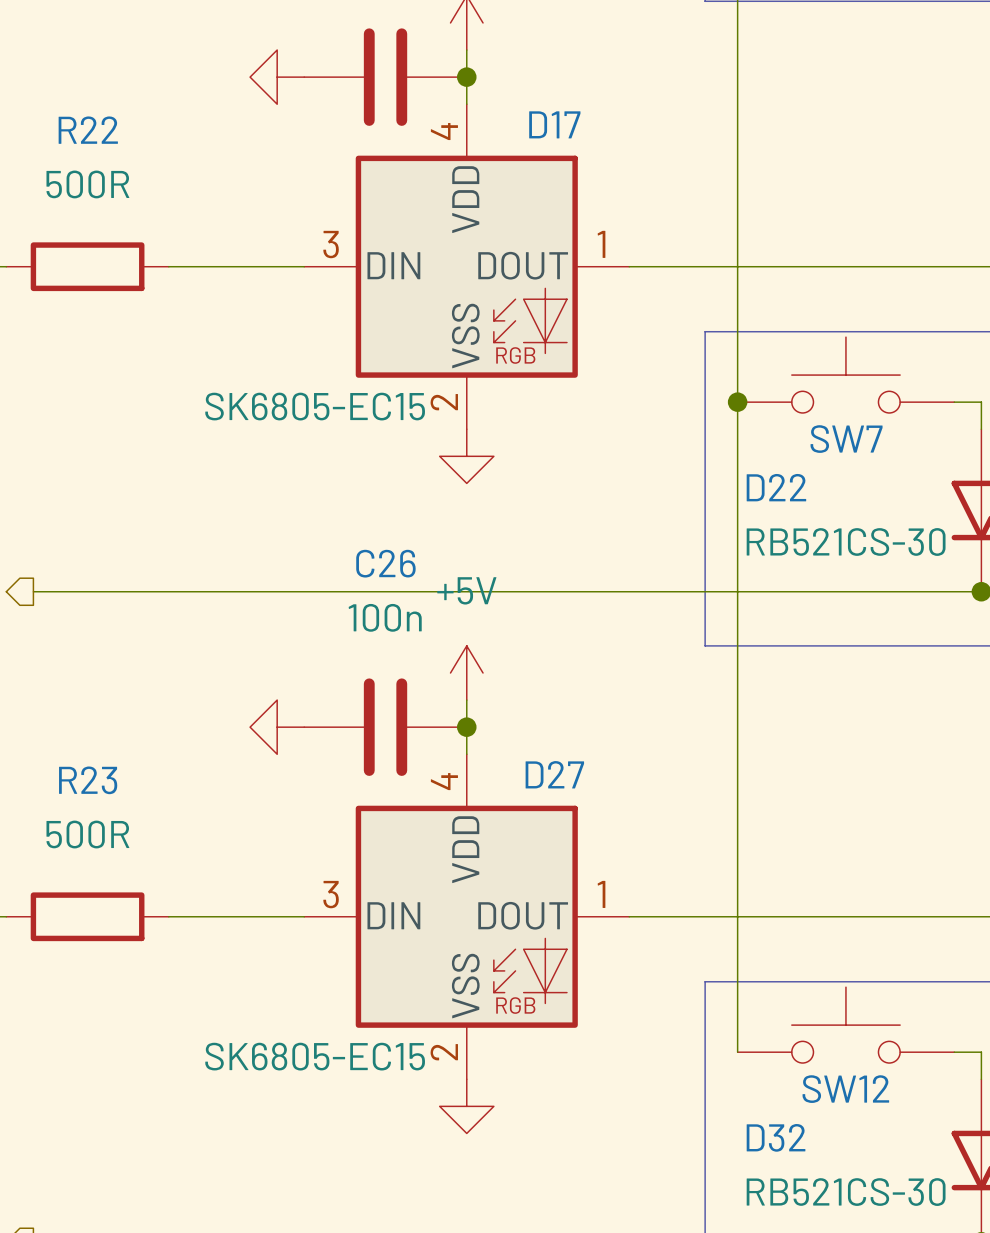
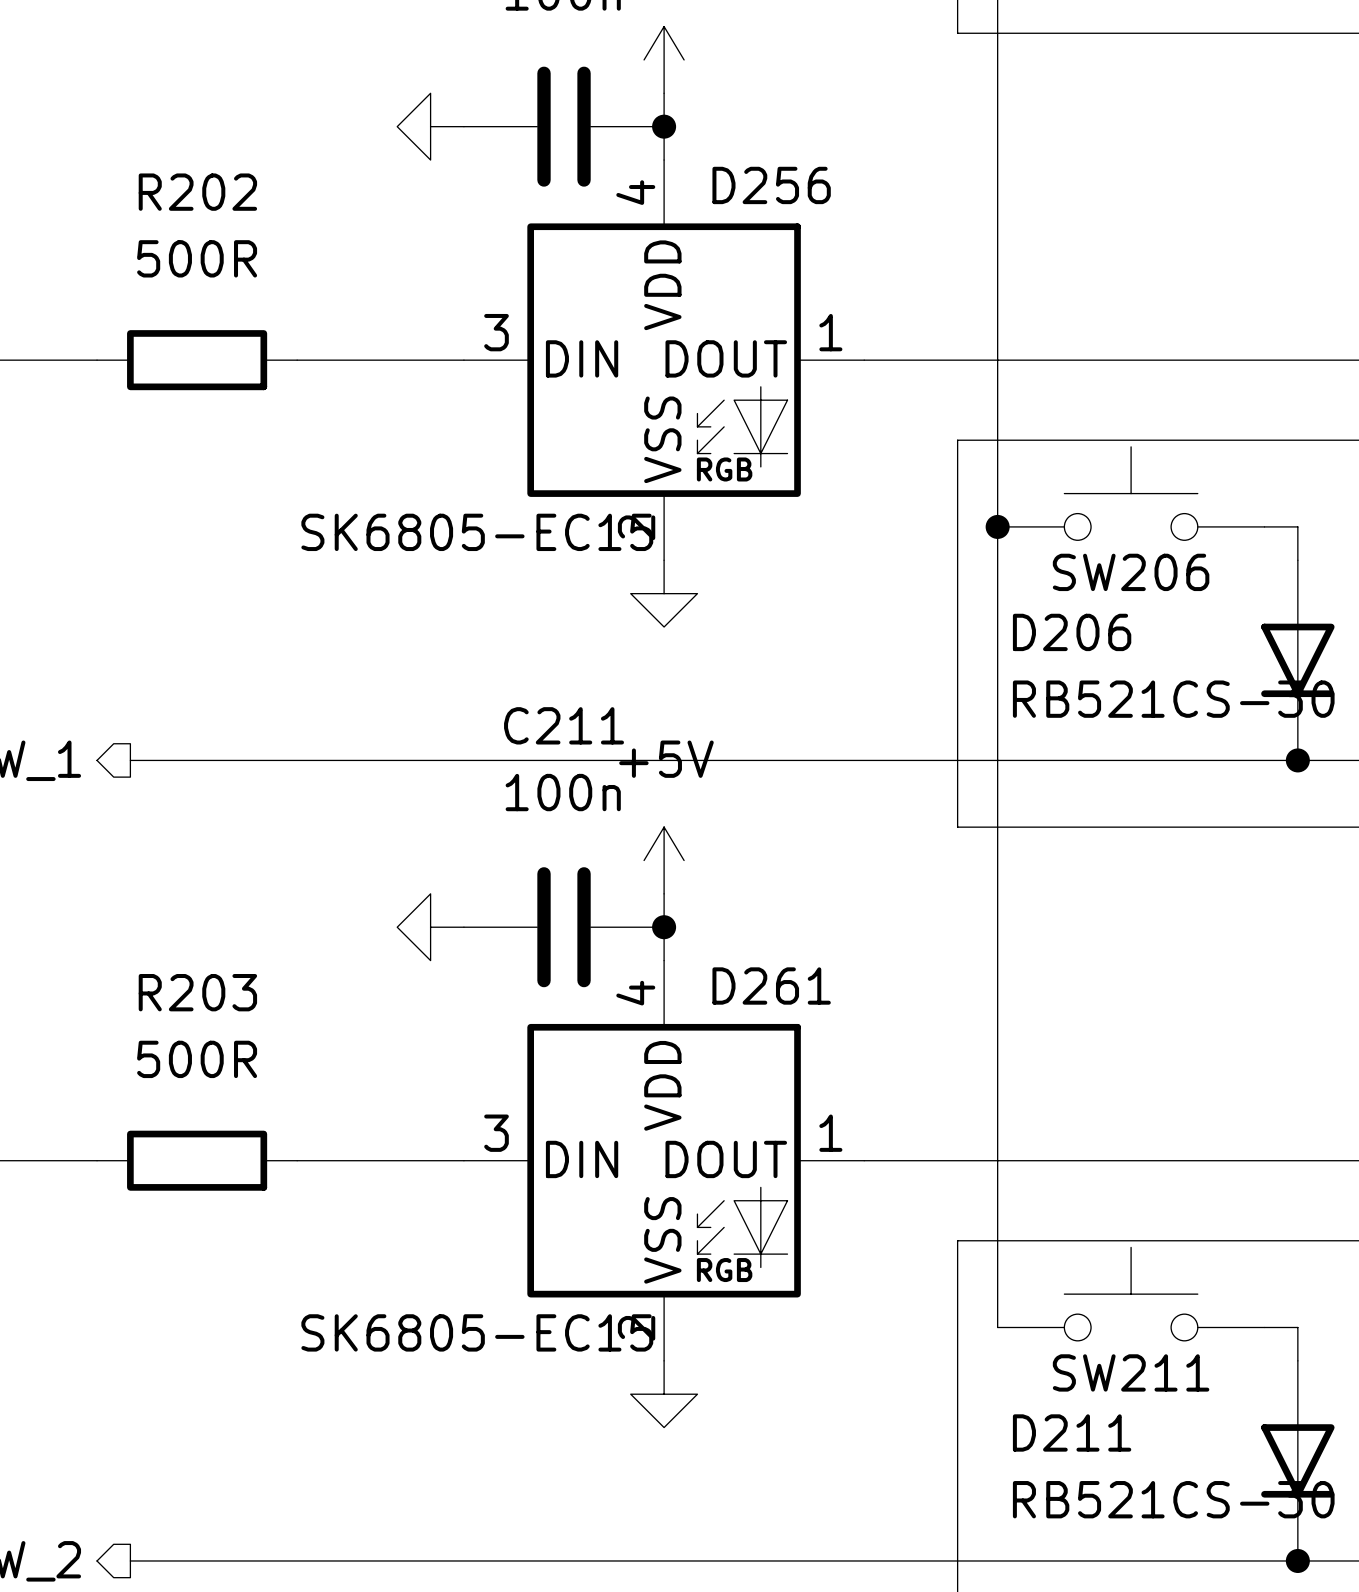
D17 name: D17 (554, 124) -> D256 (771, 185)
R22 name: R22 (88, 130) -> R202 (197, 192)
SW7 name: SW7 (846, 439) -> SW206 (1131, 572)
D22 name: D22 (776, 487) -> D206 (1072, 632)
C26 name: C26 (385, 563) -> C211 (564, 725)
D27 name: D27 (554, 774) -> D261 (771, 986)
R23 name: R23 (88, 780) -> R203 (197, 992)
SW12 name: SW12 (845, 1089) -> SW211 (1131, 1372)
D32 name: D32 (776, 1137) -> D211 (1072, 1432)

